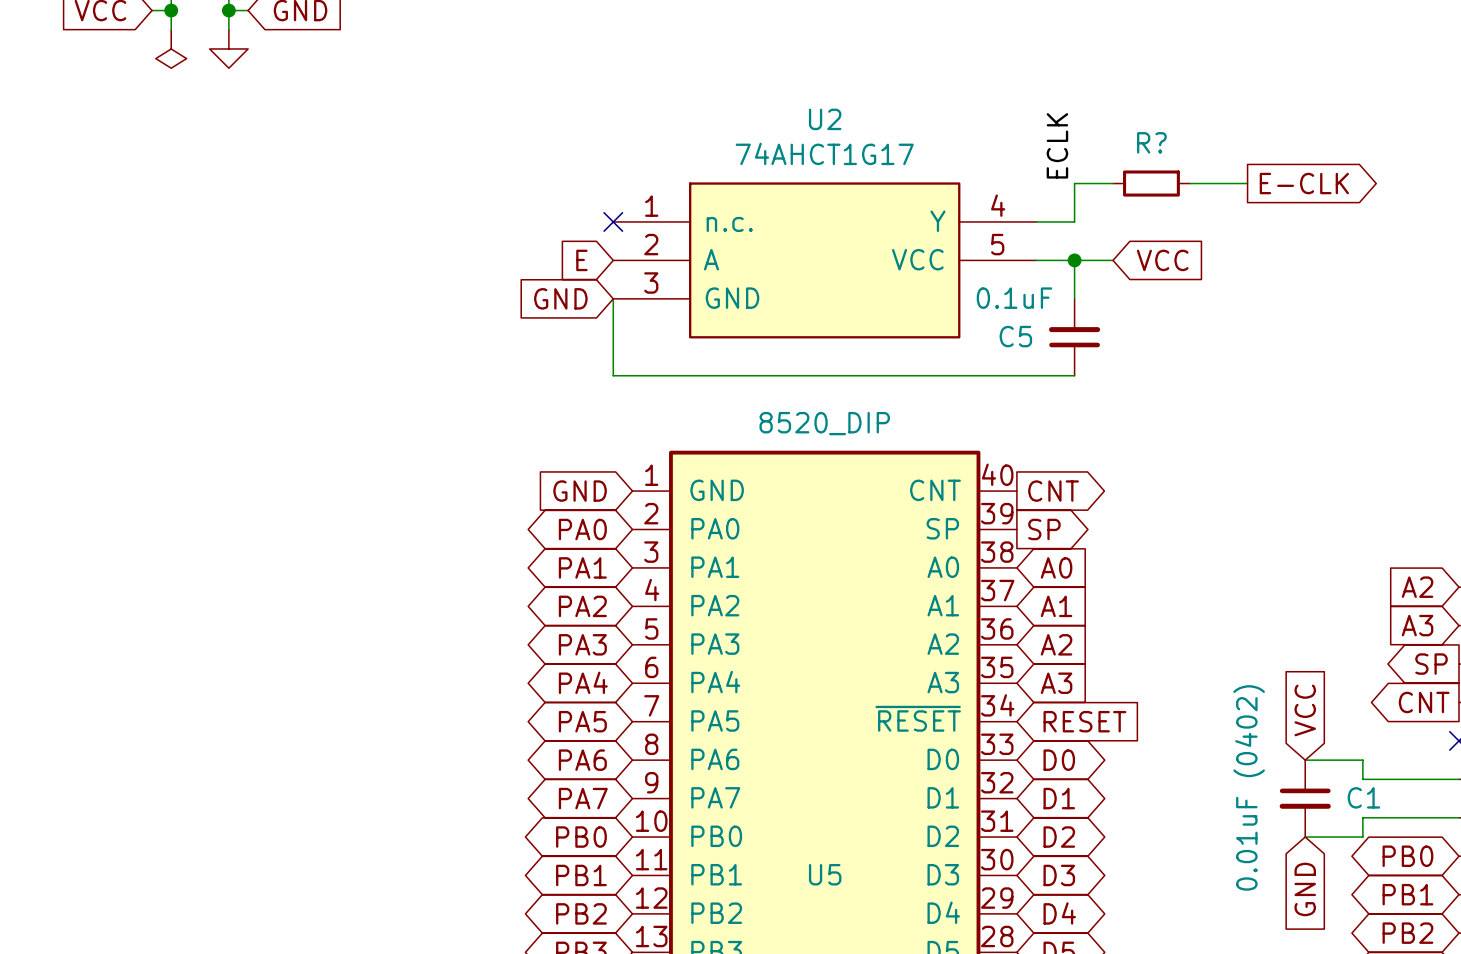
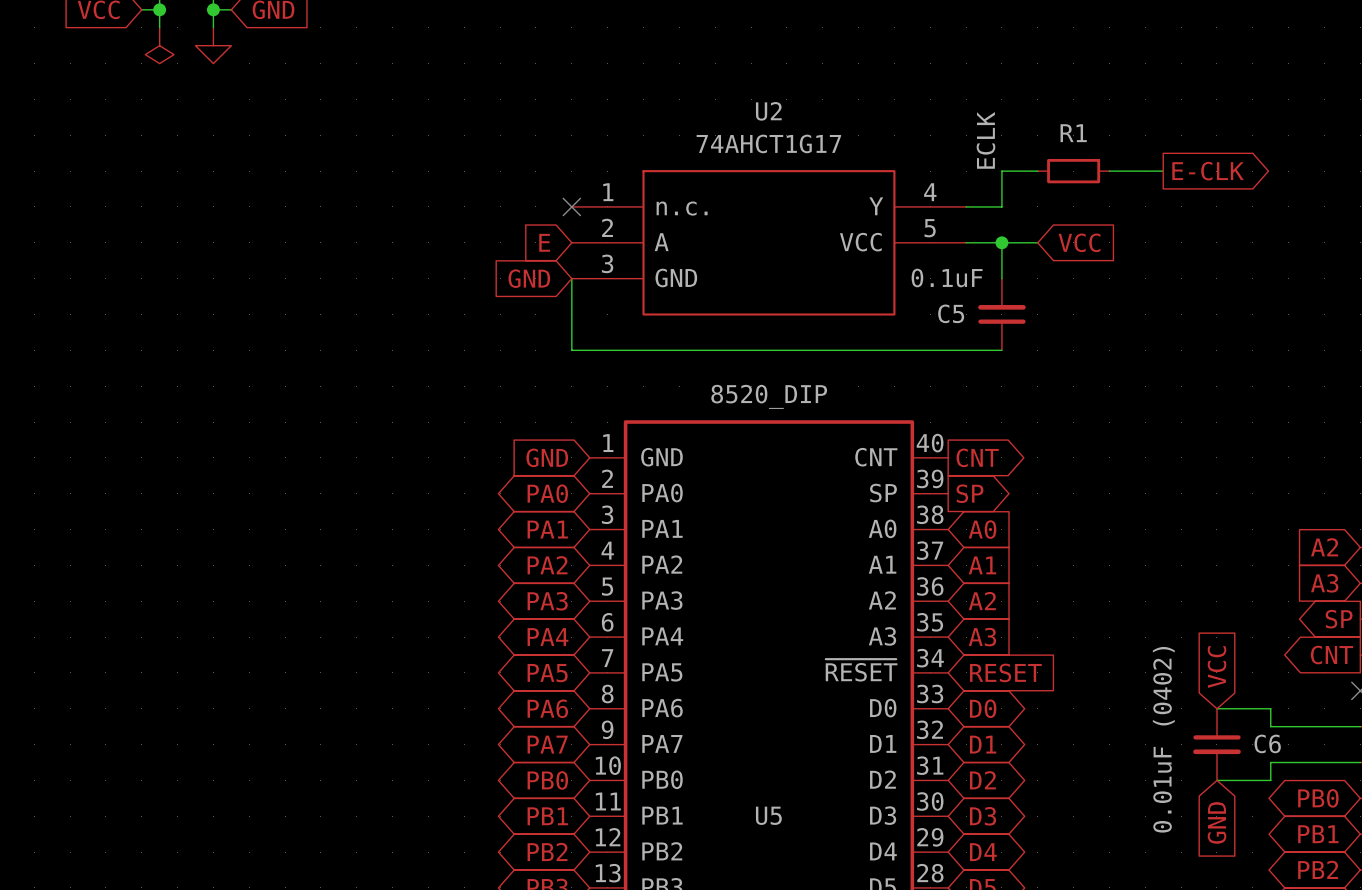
R? name: R? (1151, 142) -> R1 (1073, 133)
C1 name: C1 (1363, 797) -> C6 (1267, 743)

